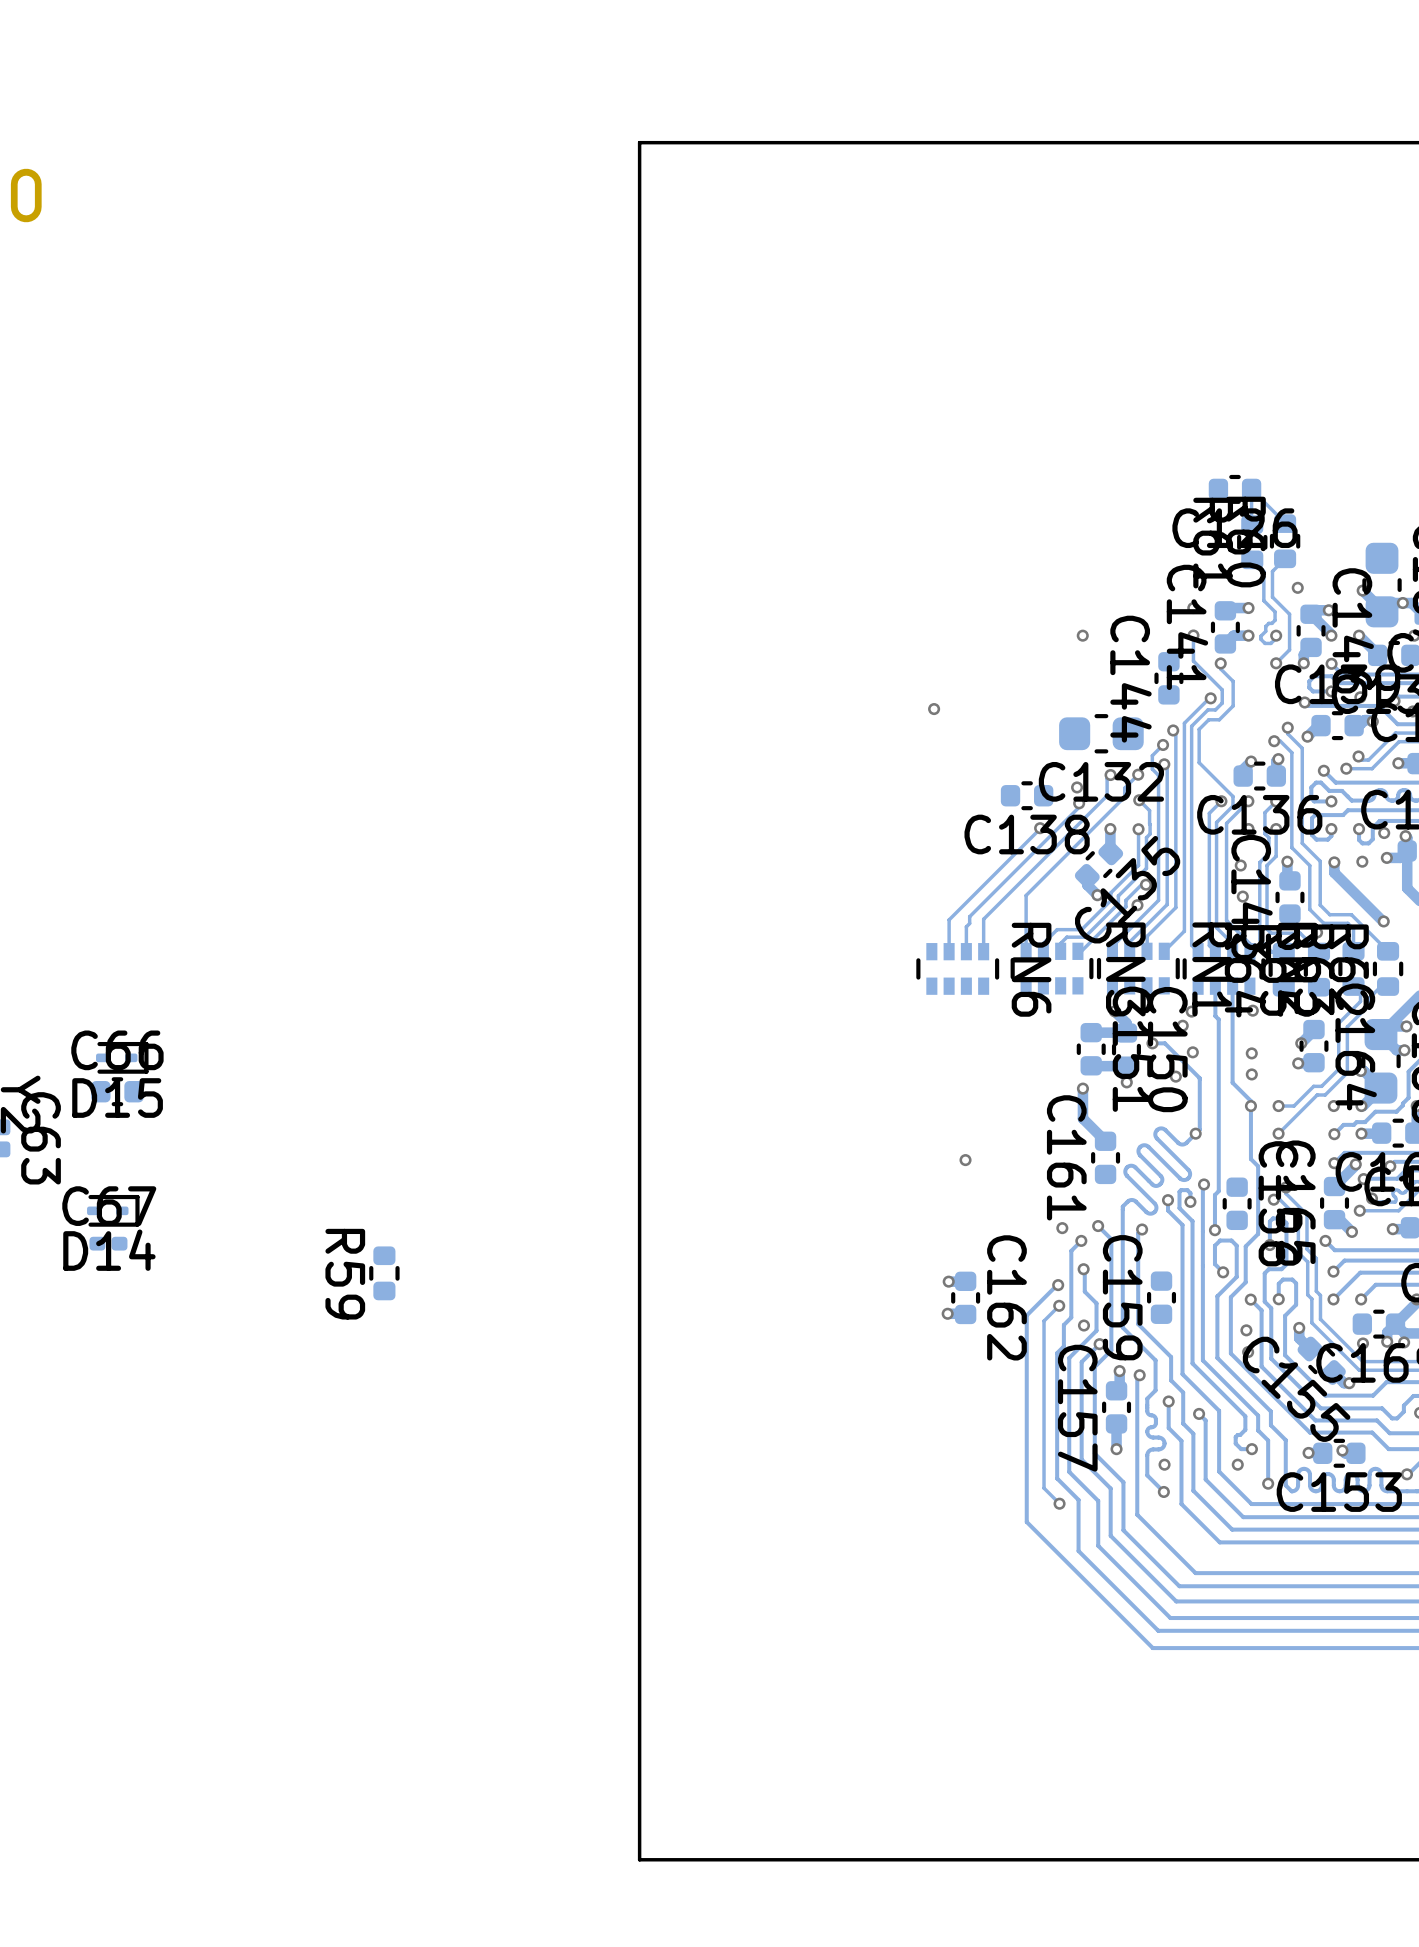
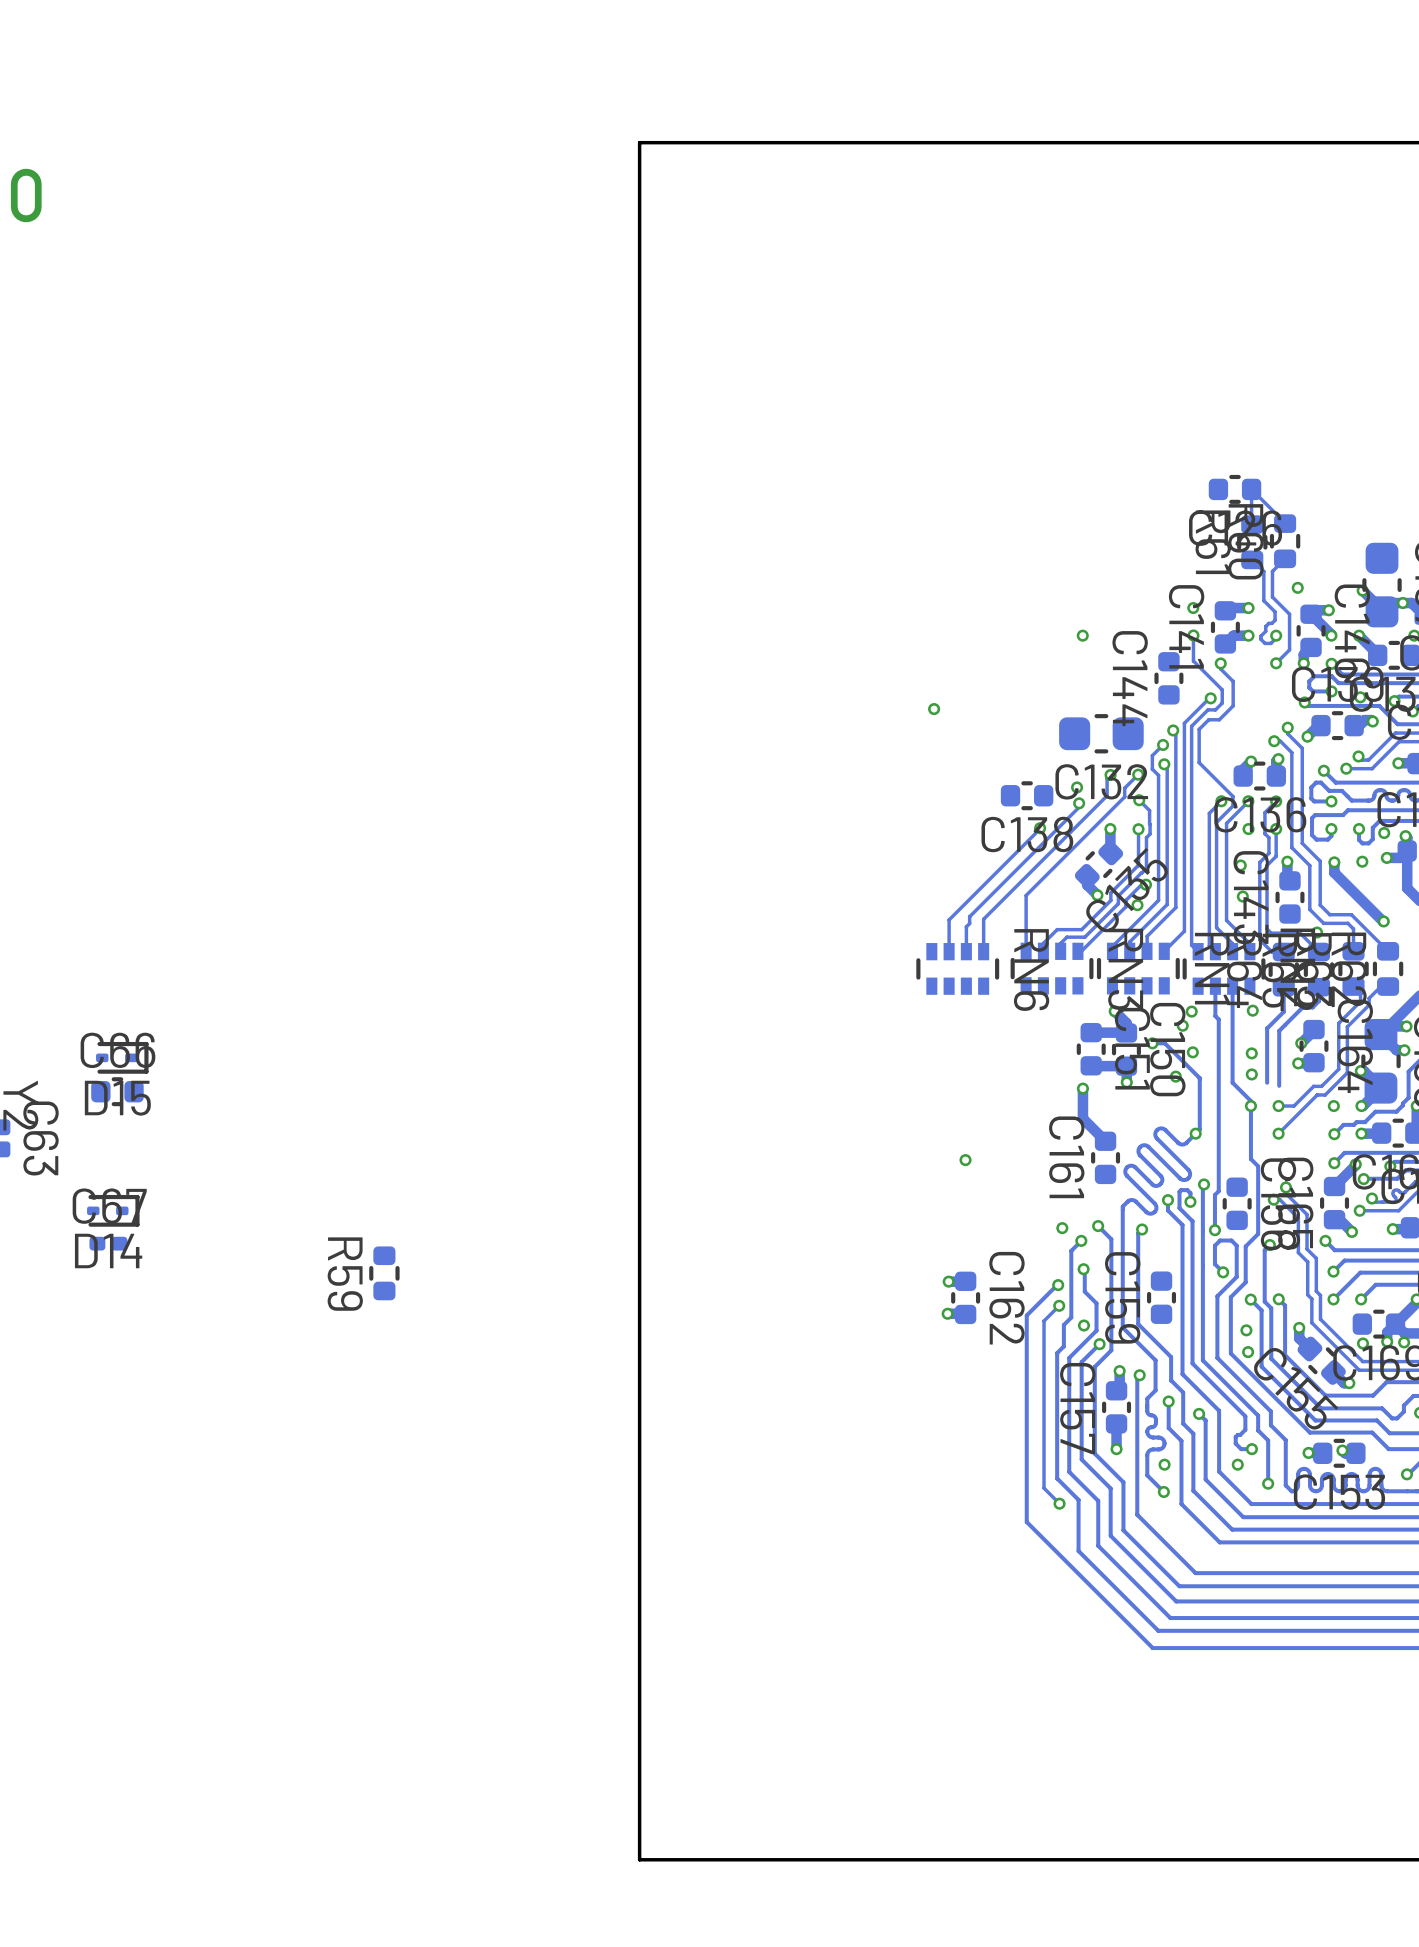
track: none -> (1283, 987) (1283, 1011) (1267, 1028) (1267, 1082)
track: none -> (1318, 987) (1318, 1001) (1312, 1007) (1302, 1007) (1279, 1030) (1279, 1085)
track: (1269, 1245) (1269, 1221) (1272, 1218) (1281, 1218) (1286, 1223) (1286, 1264) (1281, 1269) (1268, 1269) (1264, 1273) -> (1269, 1245) (1264, 1250) (1264, 1273)
track: (1278, 1299) (1278, 1283) (1283, 1279) (1292, 1279) (1296, 1283) (1296, 1304) (1285, 1315) -> (1278, 1299) (1285, 1305) (1285, 1315)

